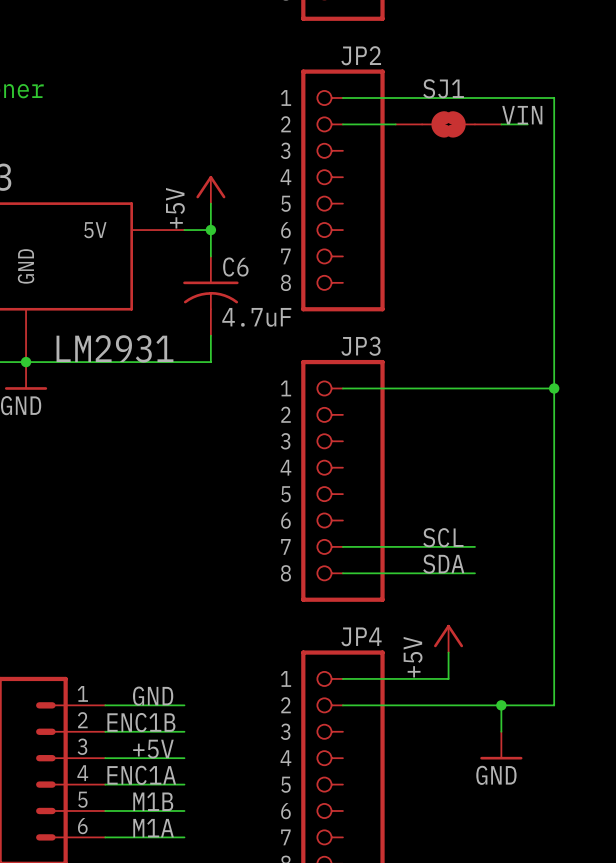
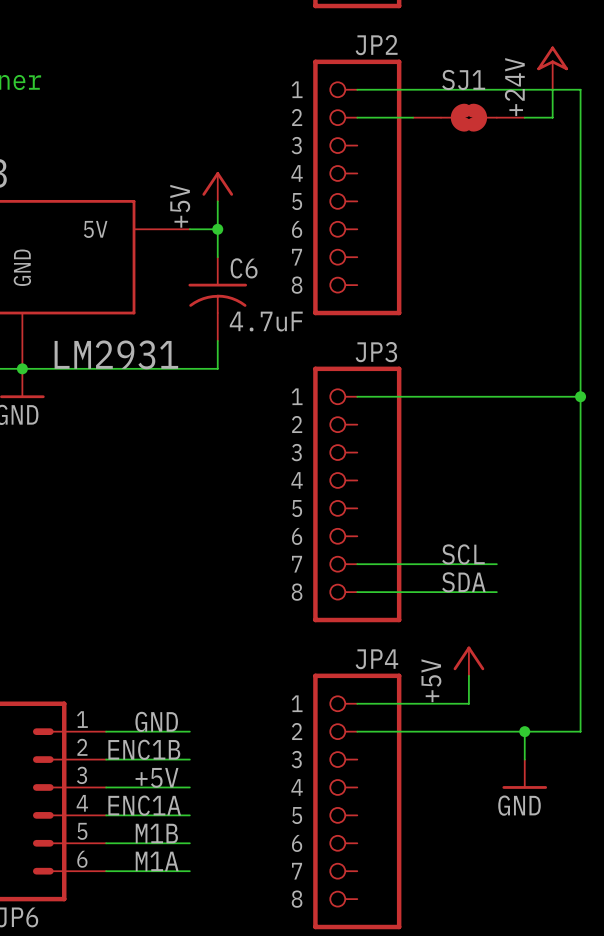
power symbol: none -> +24V (552, 68)
wire: none -> (552, 89) (552, 117)
label: VIN (522, 115) -> none

